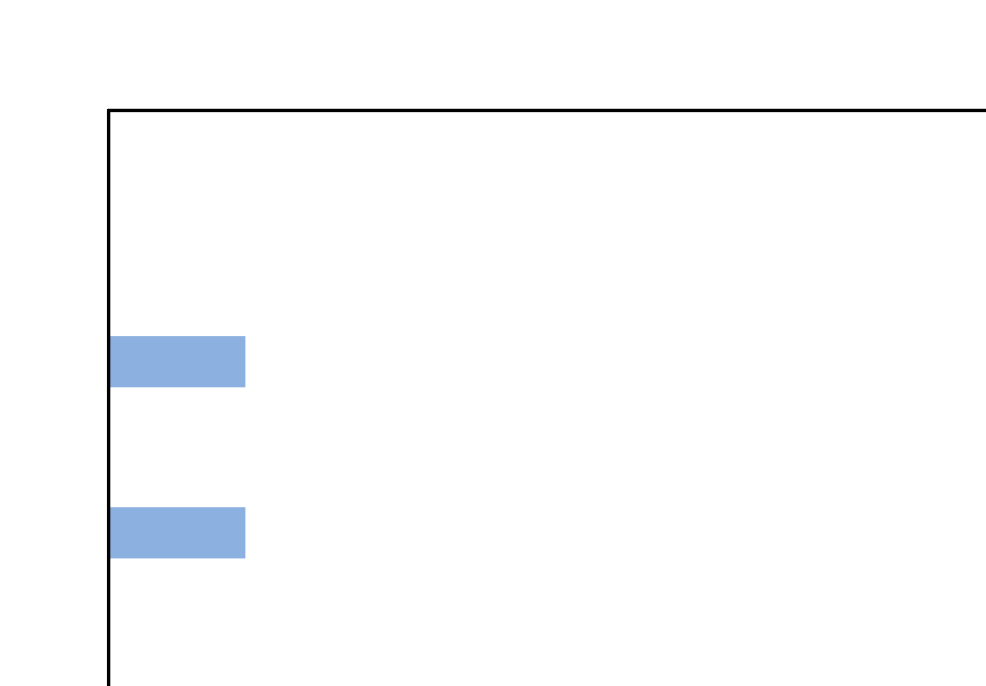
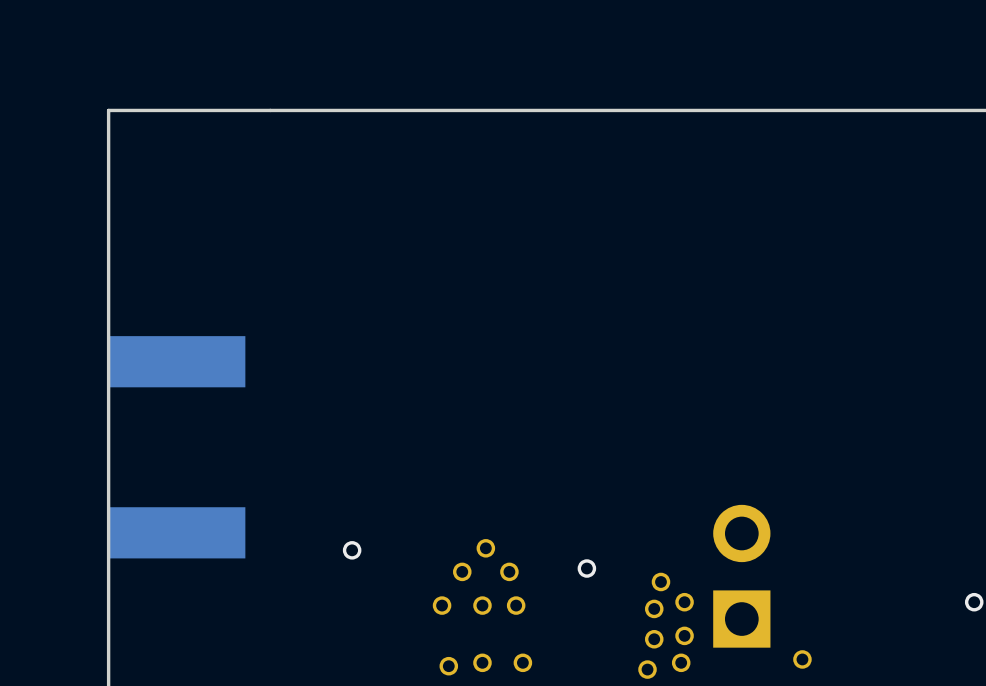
part: none -> (485, 548)
via: none -> (352, 550)
via: none -> (586, 568)
part: none -> (462, 571)
part: none -> (509, 571)
part: none -> (741, 576)
part: none -> (660, 581)
part: none -> (684, 602)
via: none -> (974, 602)
part: none -> (442, 605)
part: none -> (482, 605)
part: none -> (516, 605)
part: none -> (654, 608)
part: none -> (684, 635)
part: none -> (654, 639)
part: none -> (802, 659)
part: none -> (482, 662)
part: none -> (522, 662)
part: none -> (681, 662)
part: none -> (448, 666)
part: none -> (647, 669)

